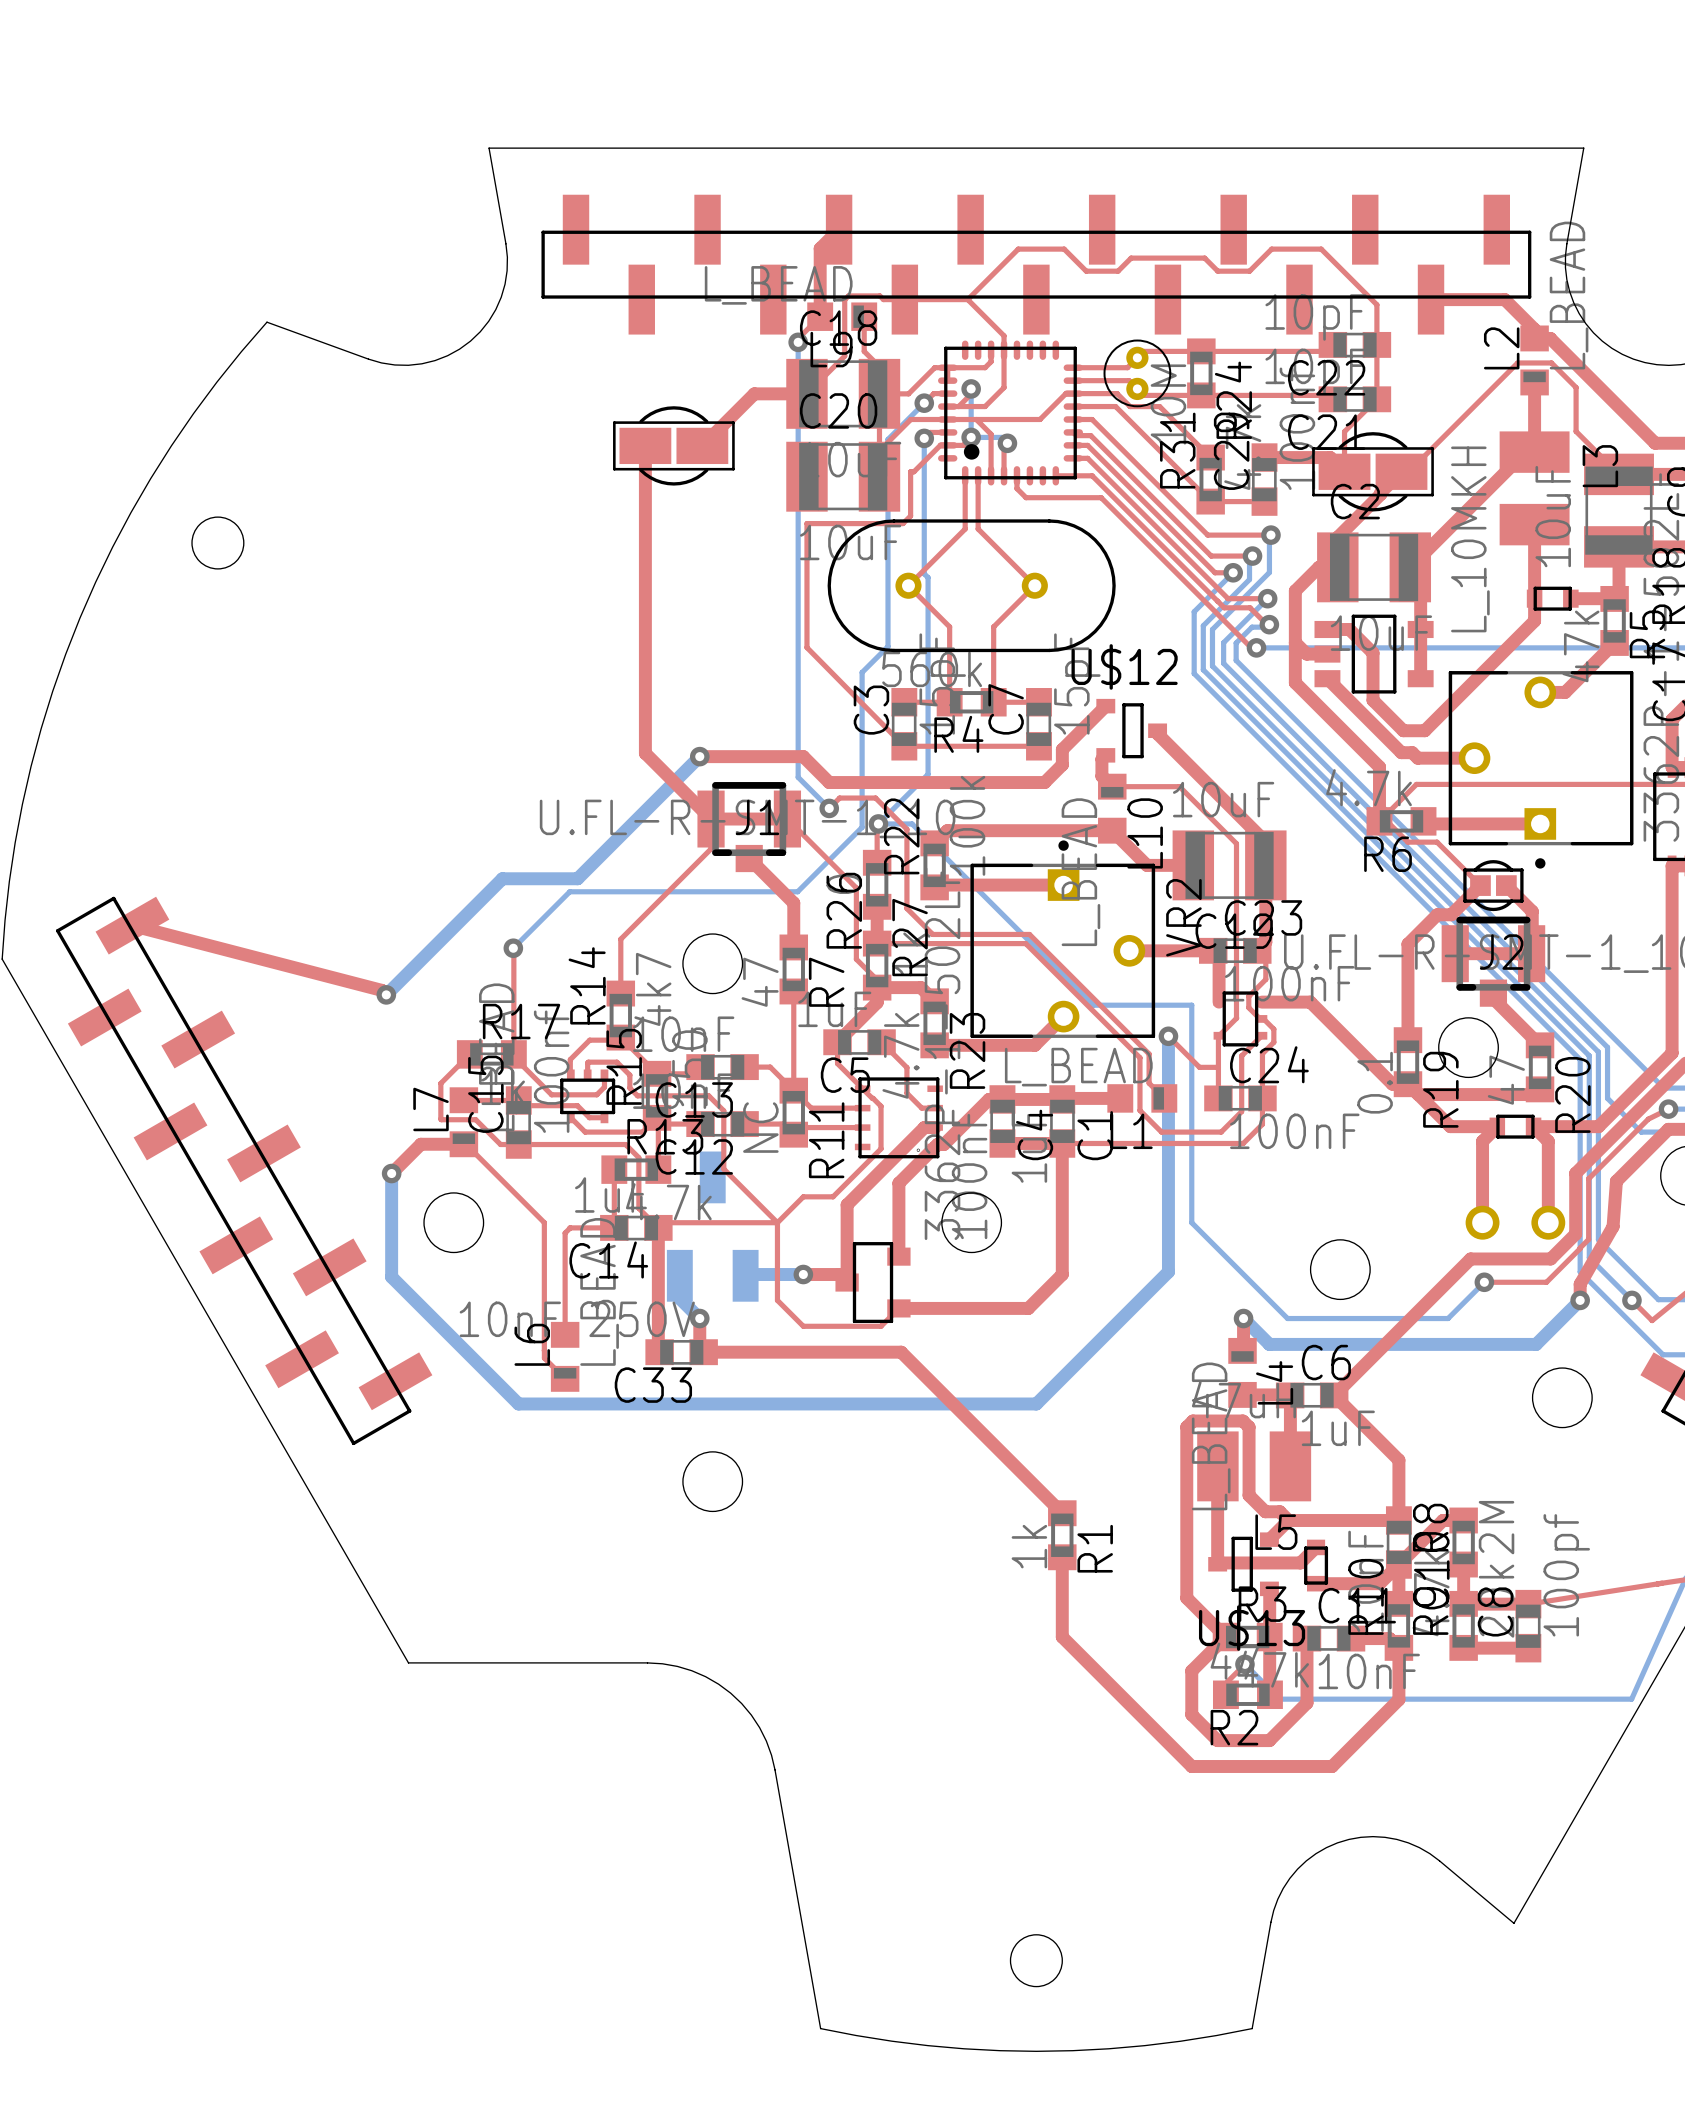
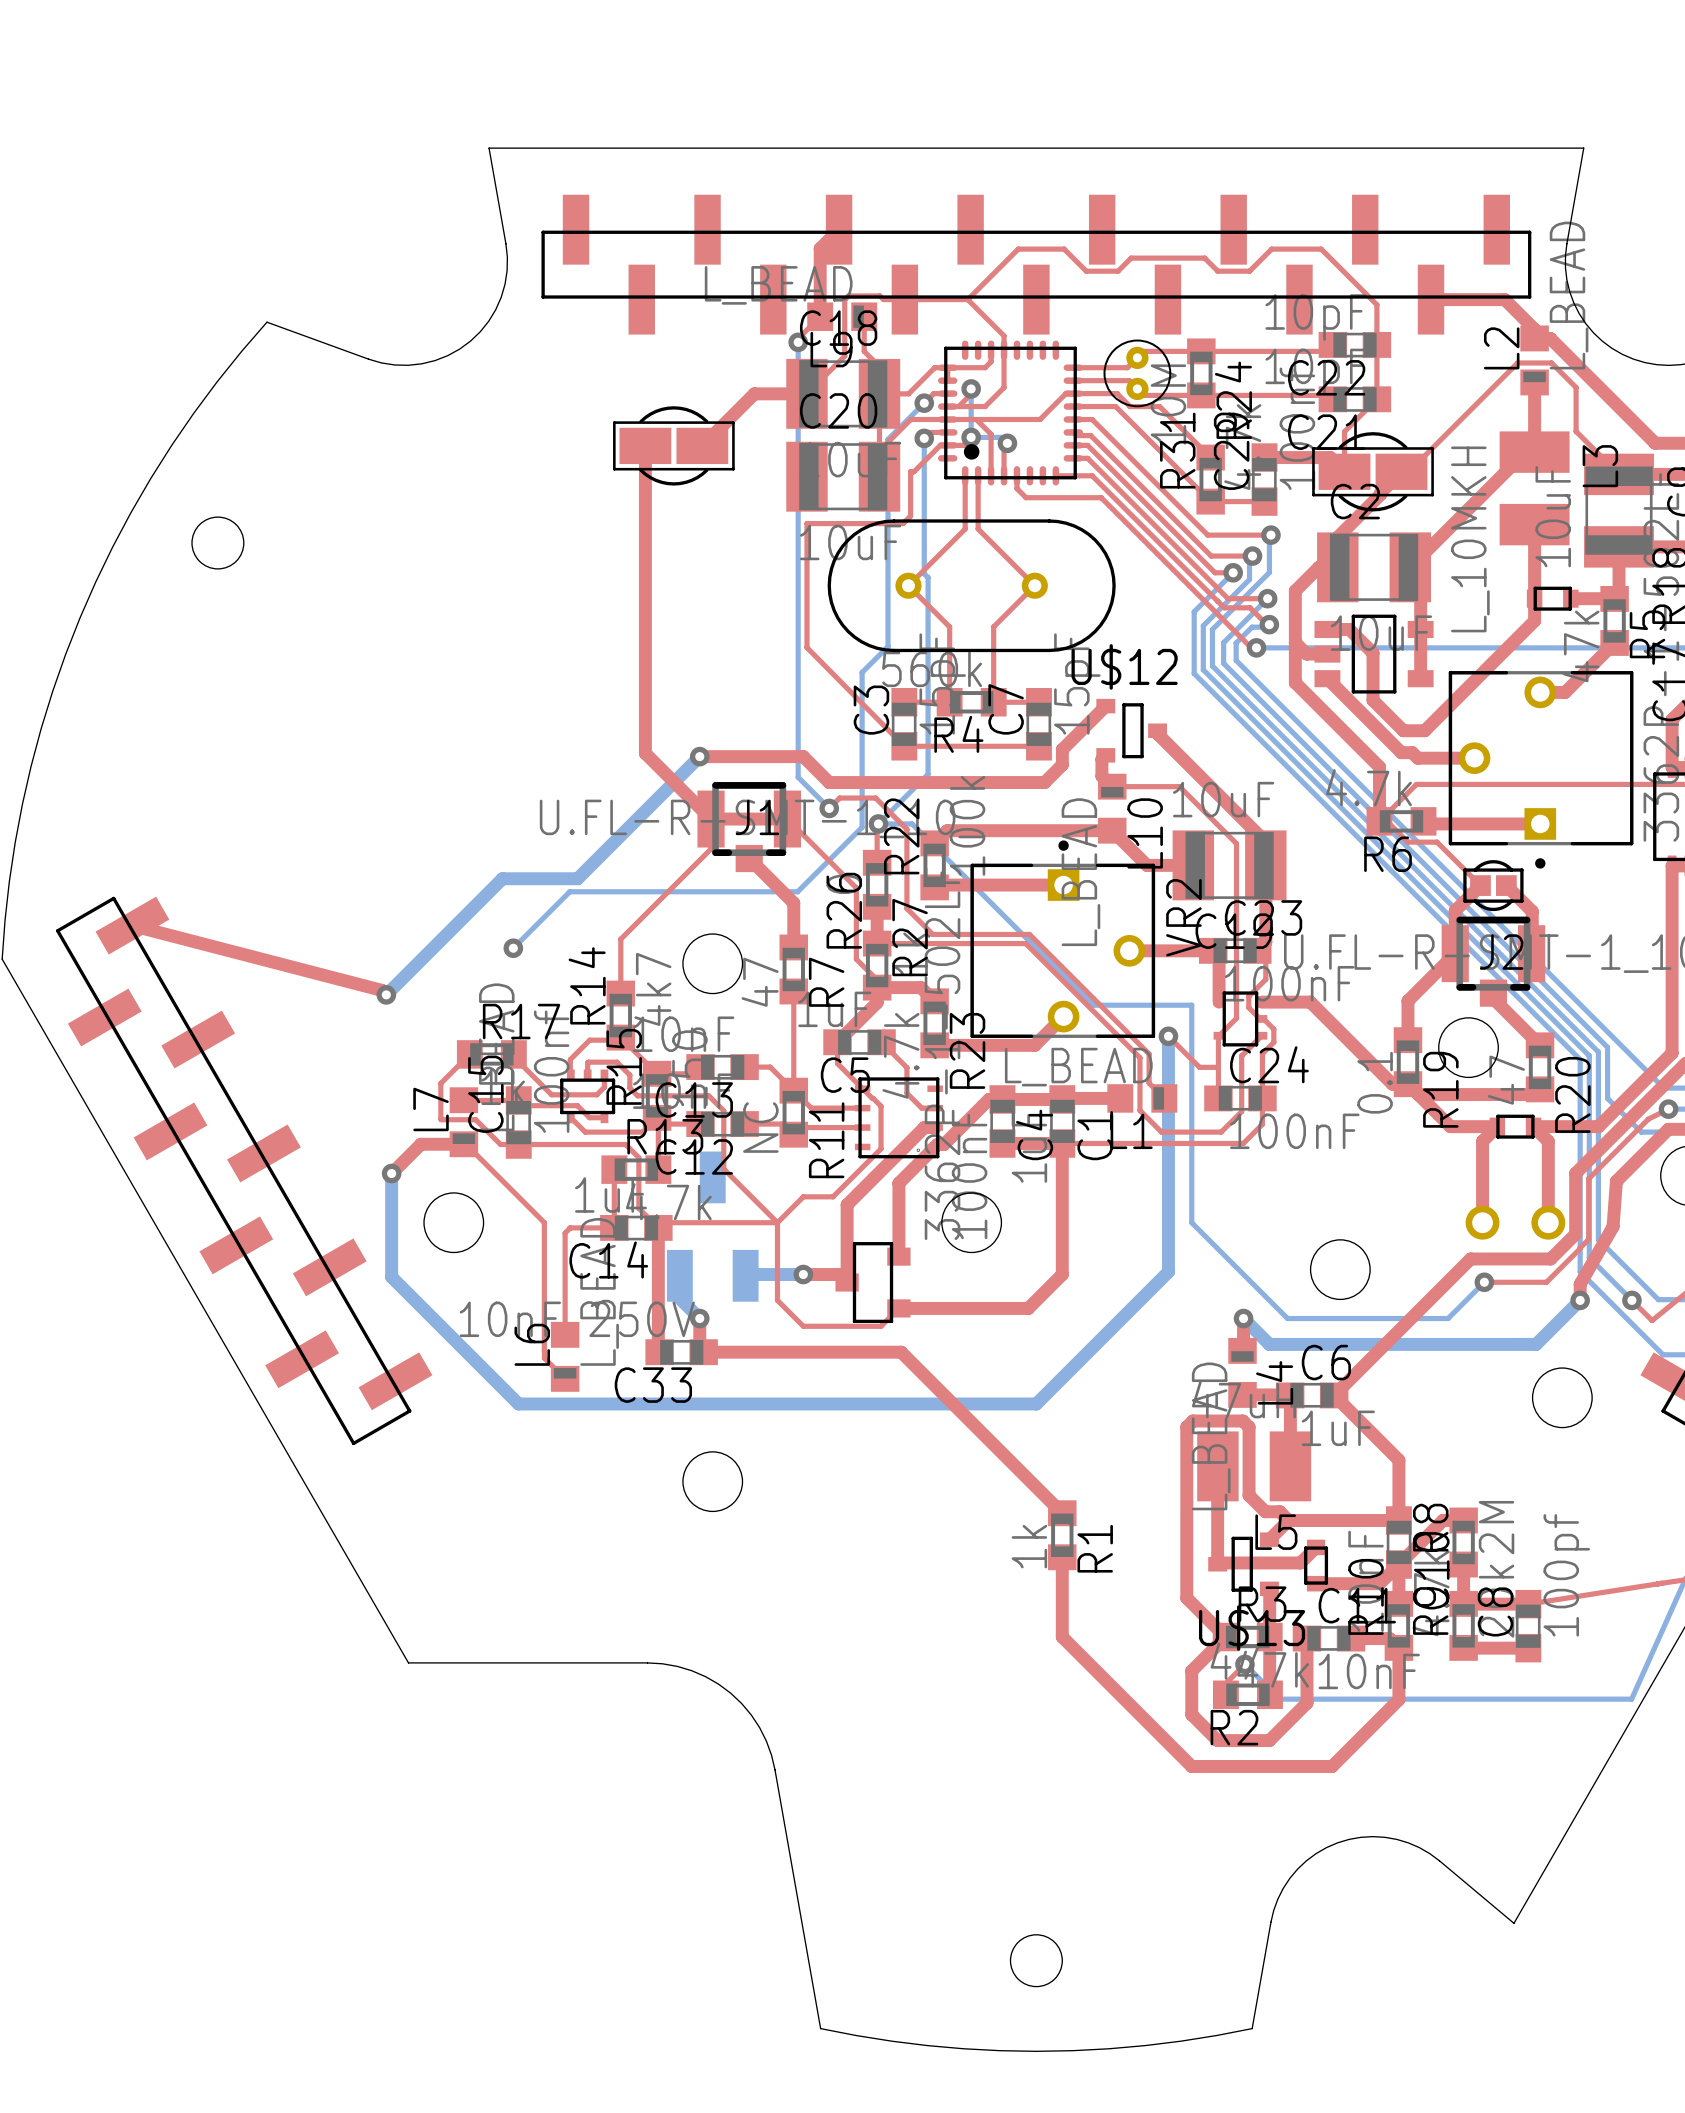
top track: (1455, 910) (1451, 914) (1437, 914) (1407, 944) (1407, 1000) -> (1455, 910) (1455, 953) (1407, 1000)
top track: (513, 948) (513, 1054) -> none
top track: (1455, 953) (1522, 953) (1532, 963) -> none

